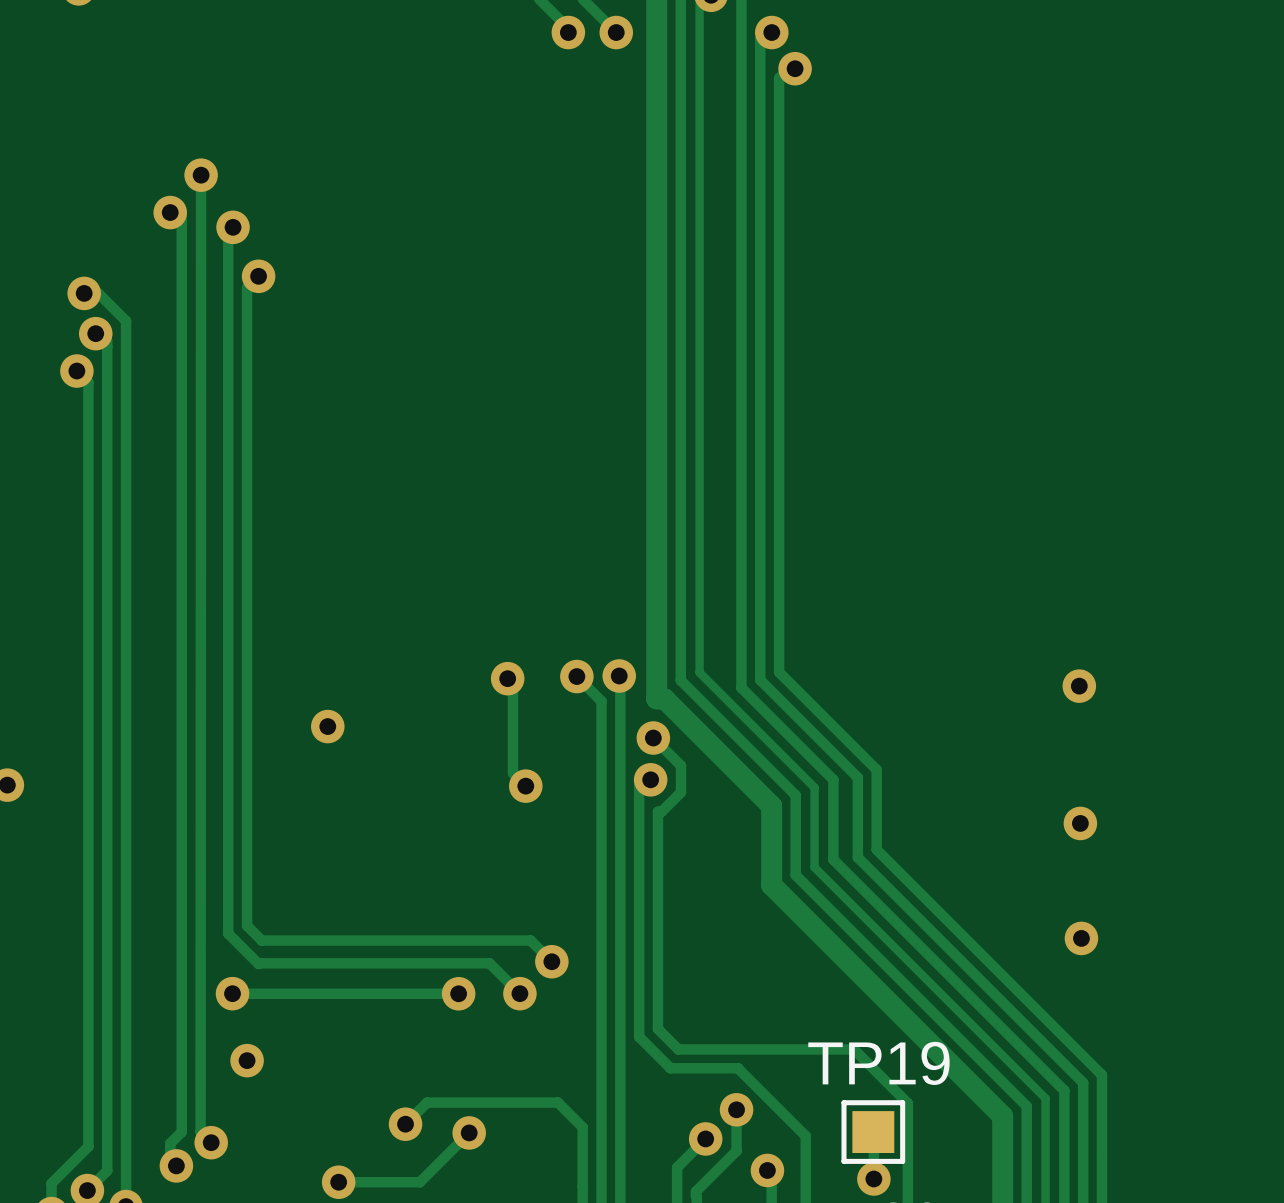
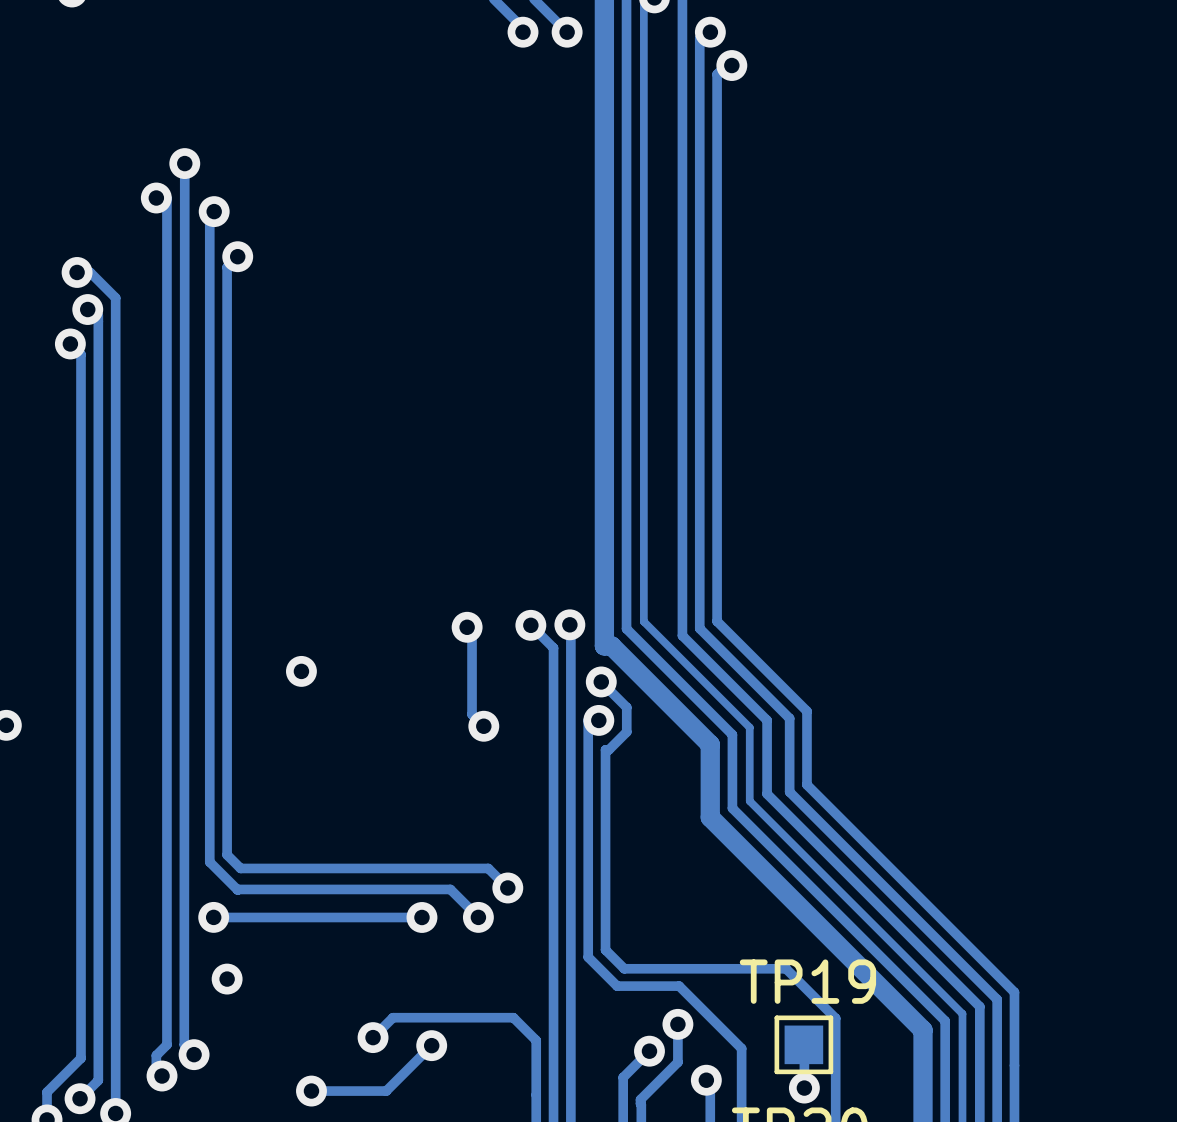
via: (1079, 686) -> none
via: (1080, 823) -> none
via: (1081, 938) -> none

